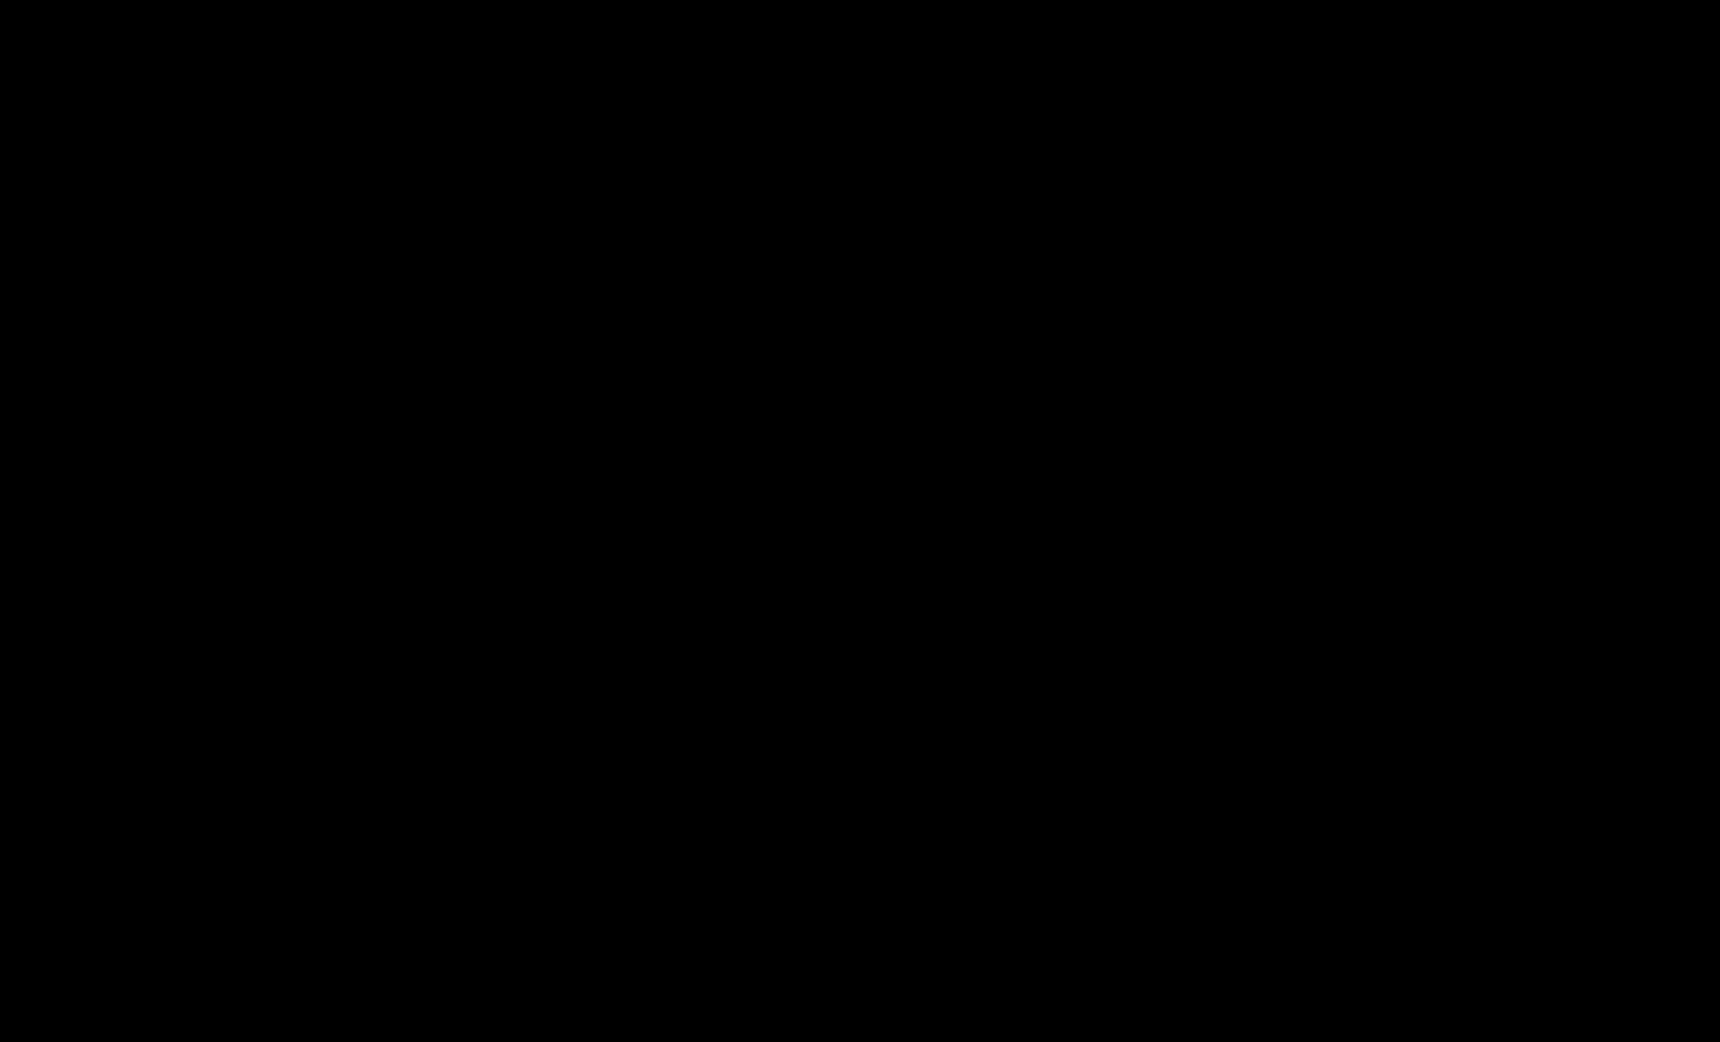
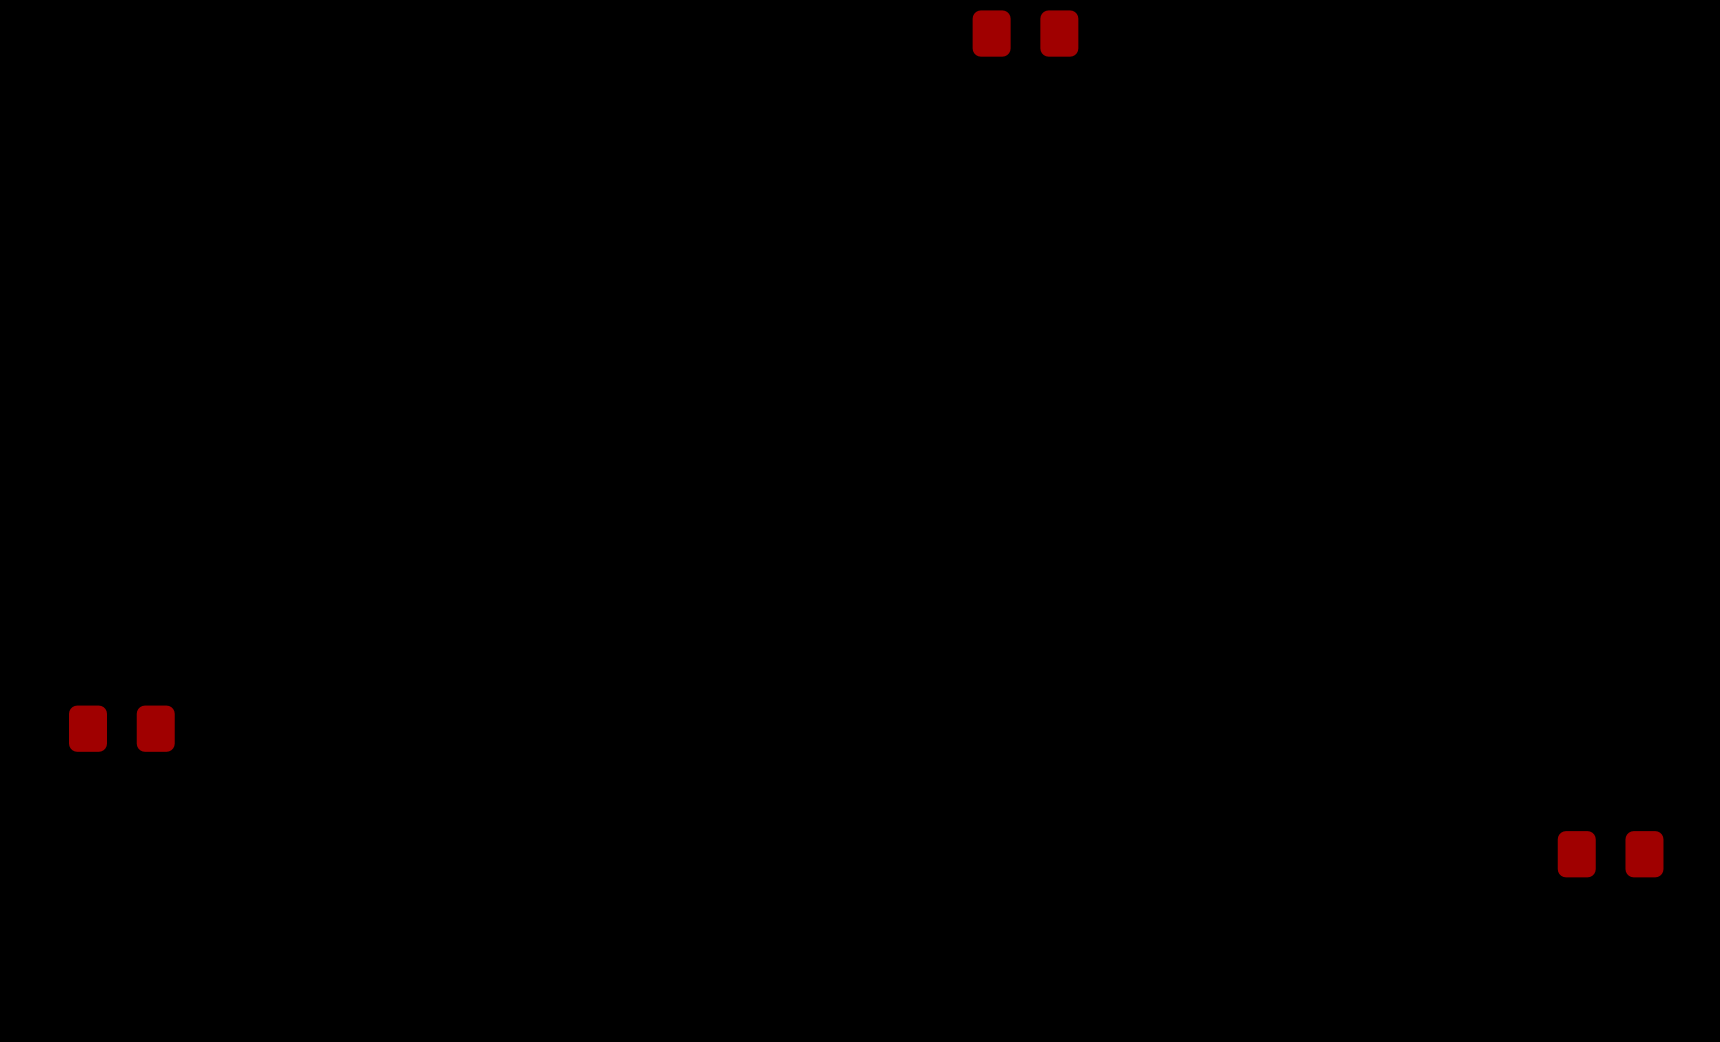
part: none -> (1025, 33)
part: none -> (121, 728)
part: none -> (1610, 854)

